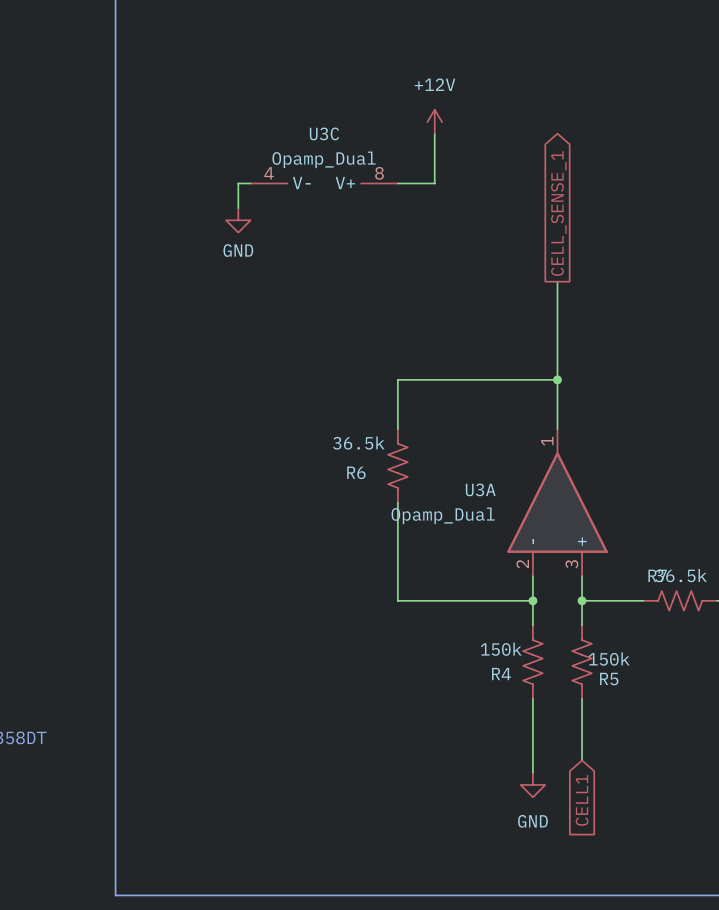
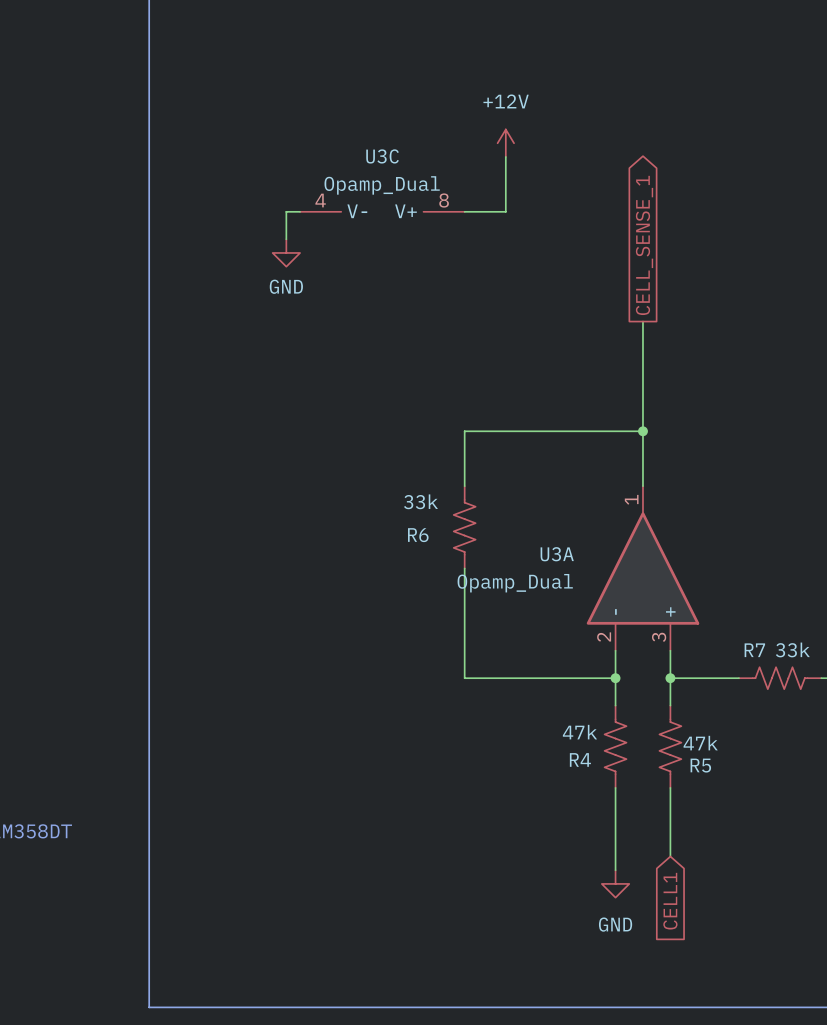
R6 value: 36.5k (358, 442) -> 33k (420, 501)
R7 value: 36.5k (681, 575) -> 33k (792, 649)
R4 value: 150k (501, 649) -> 47k (579, 732)
R5 value: 150k (609, 659) -> 47k (700, 743)

